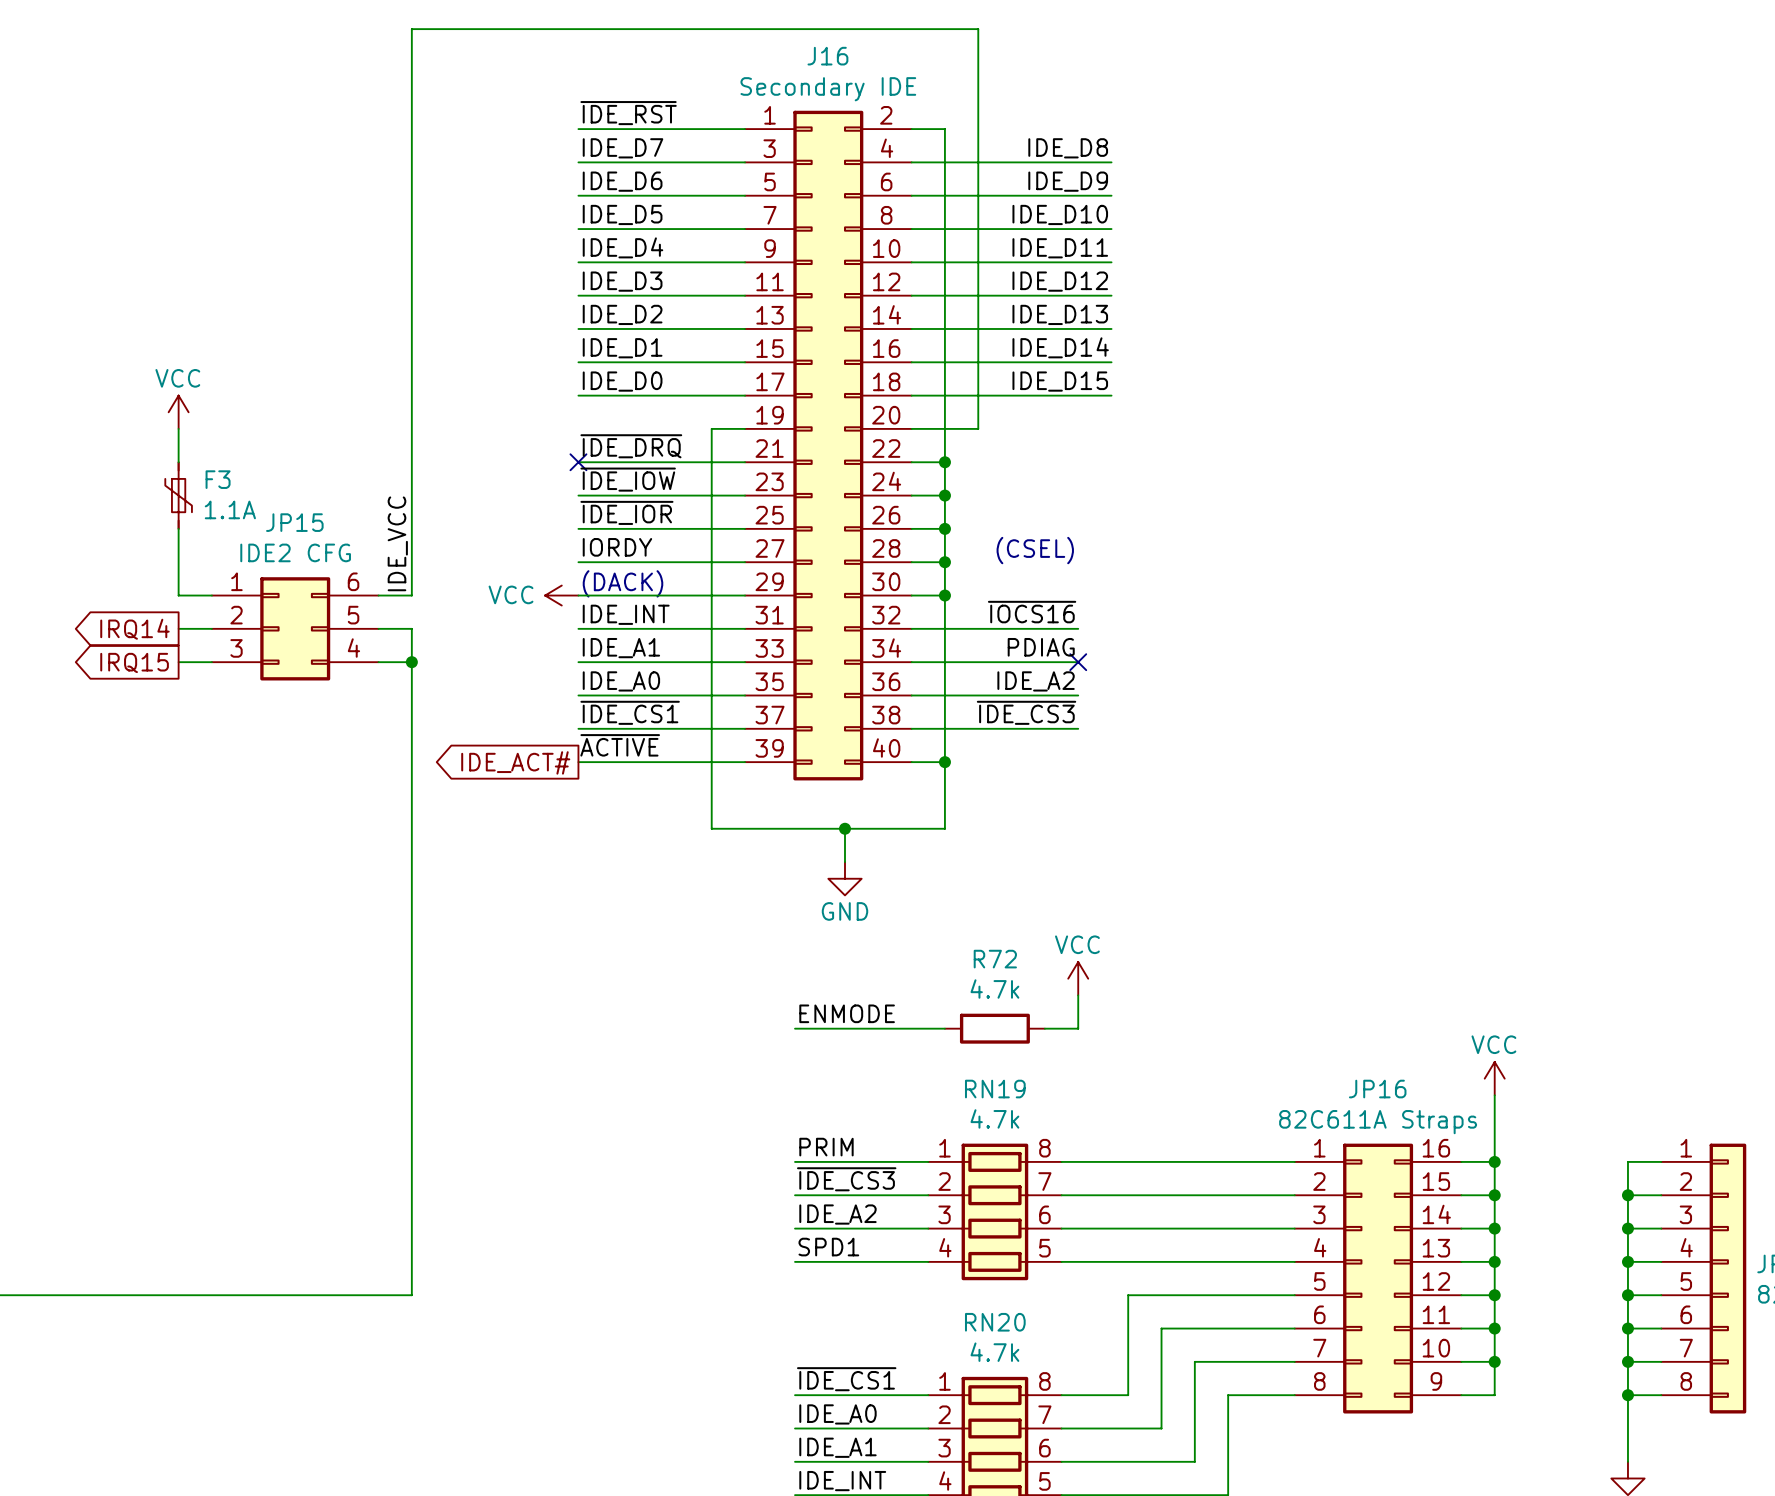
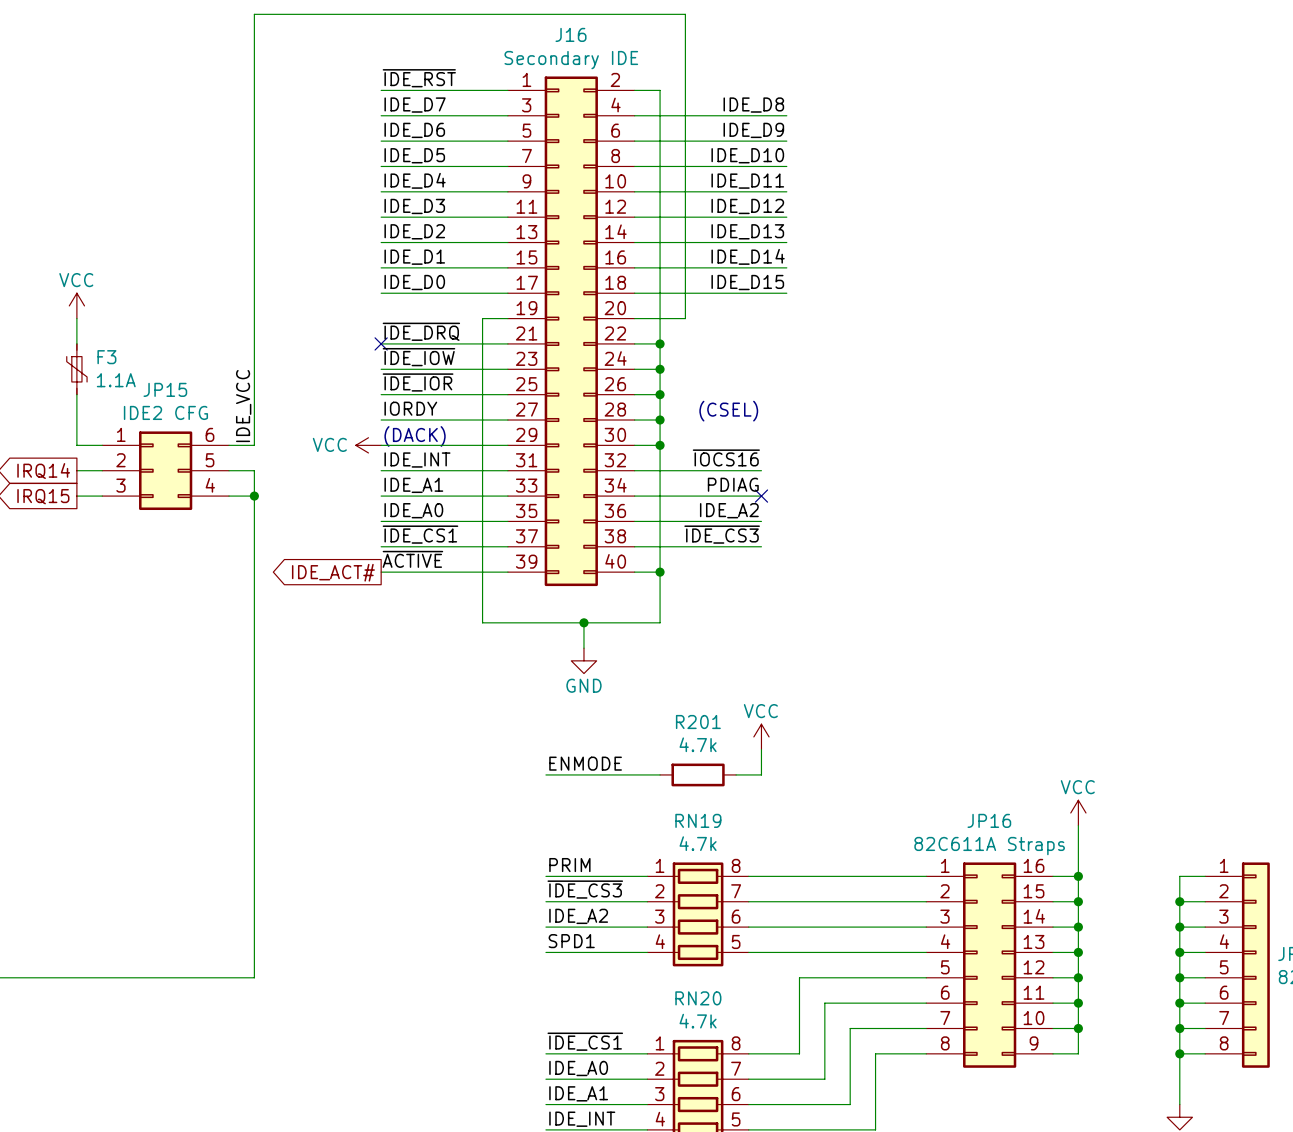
R72 name: R72 (995, 959) -> R201 (698, 722)

